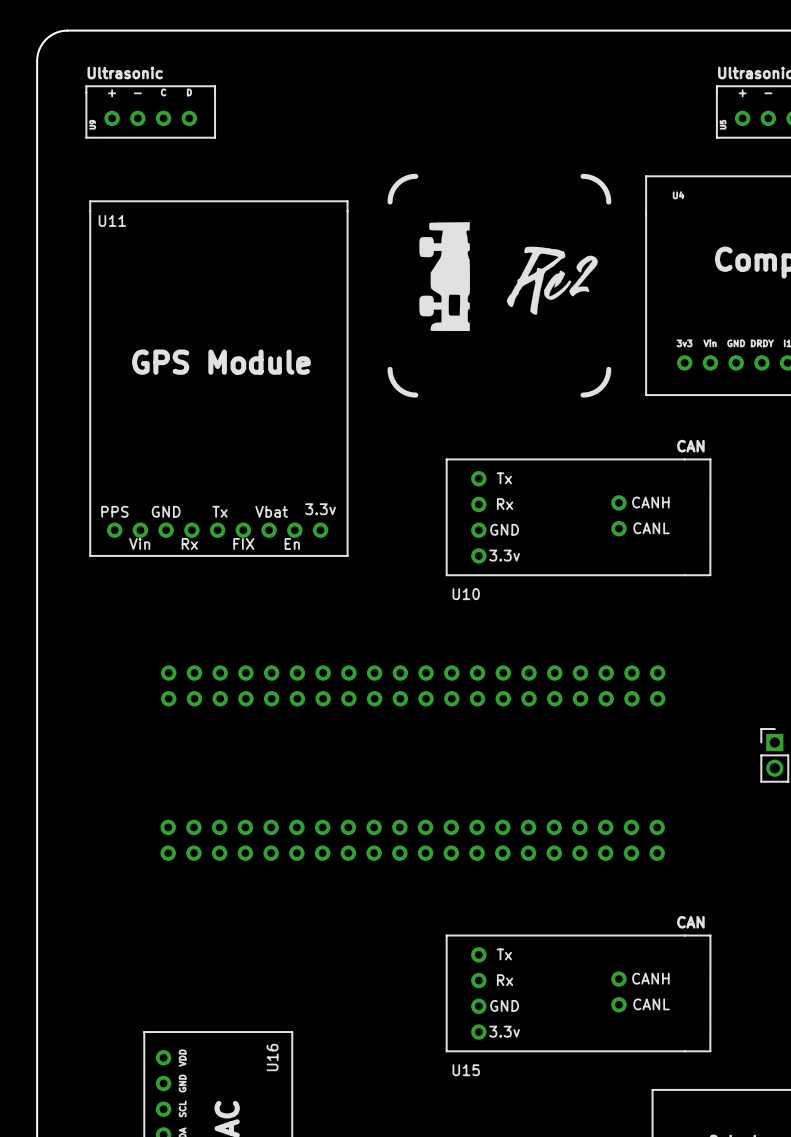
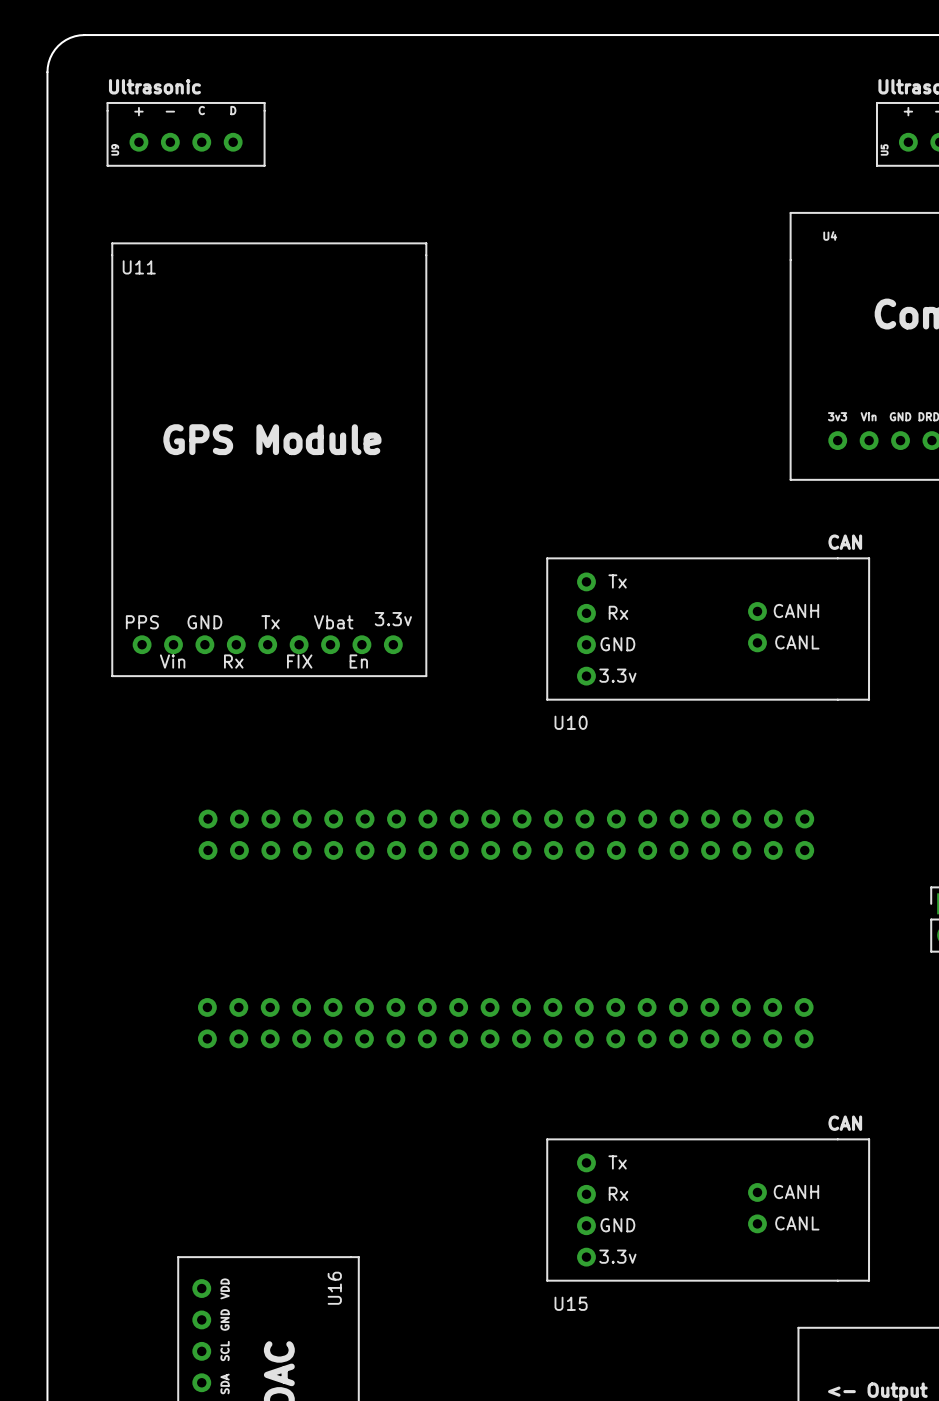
line: (415, 176) (405, 178) (397, 183) (392, 192) (390, 202) -> none
line: (583, 176) (592, 178) (601, 183) (606, 192) (608, 202) -> none
drawing: [419, 222, 598, 332] -> none
line: (390, 369) (392, 379) (397, 387) (405, 393) (415, 395) -> none
line: (608, 369) (606, 379) (601, 387) (592, 393) (583, 395) -> none

